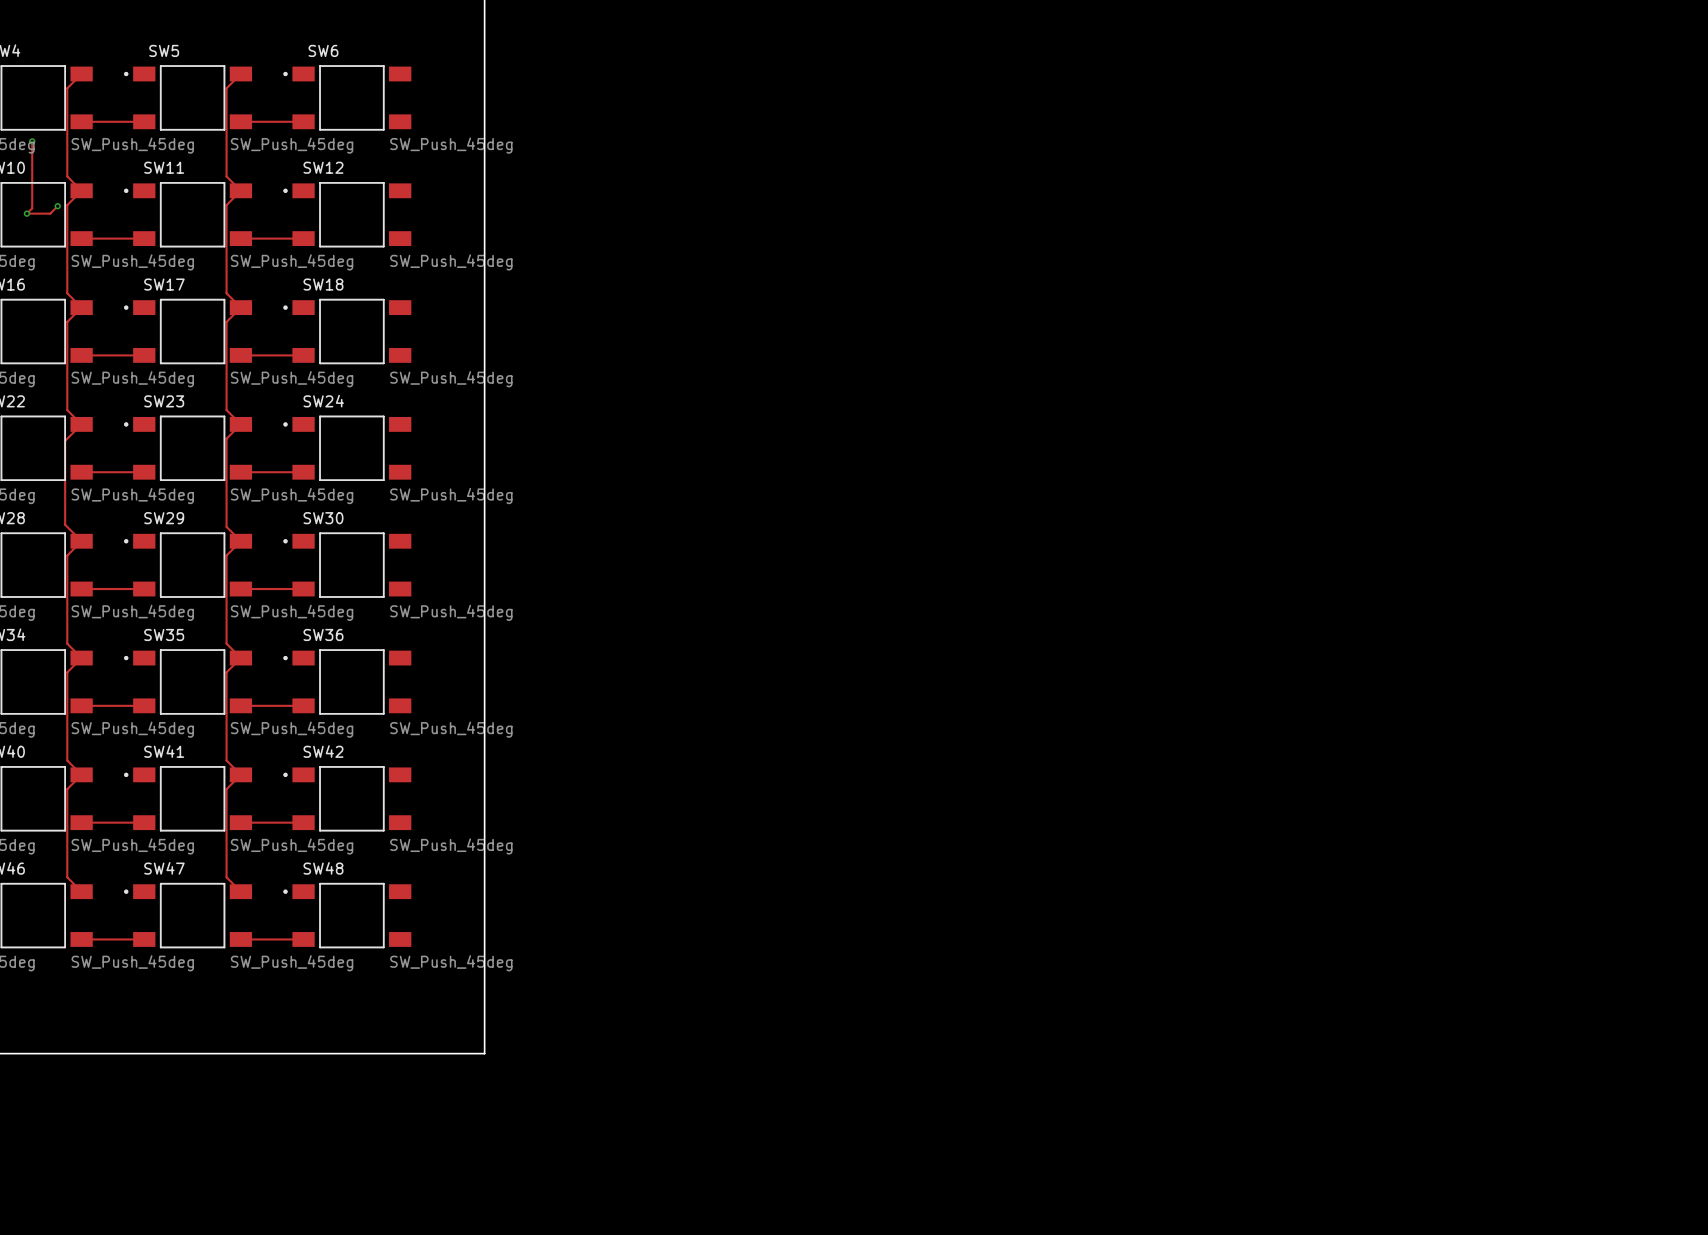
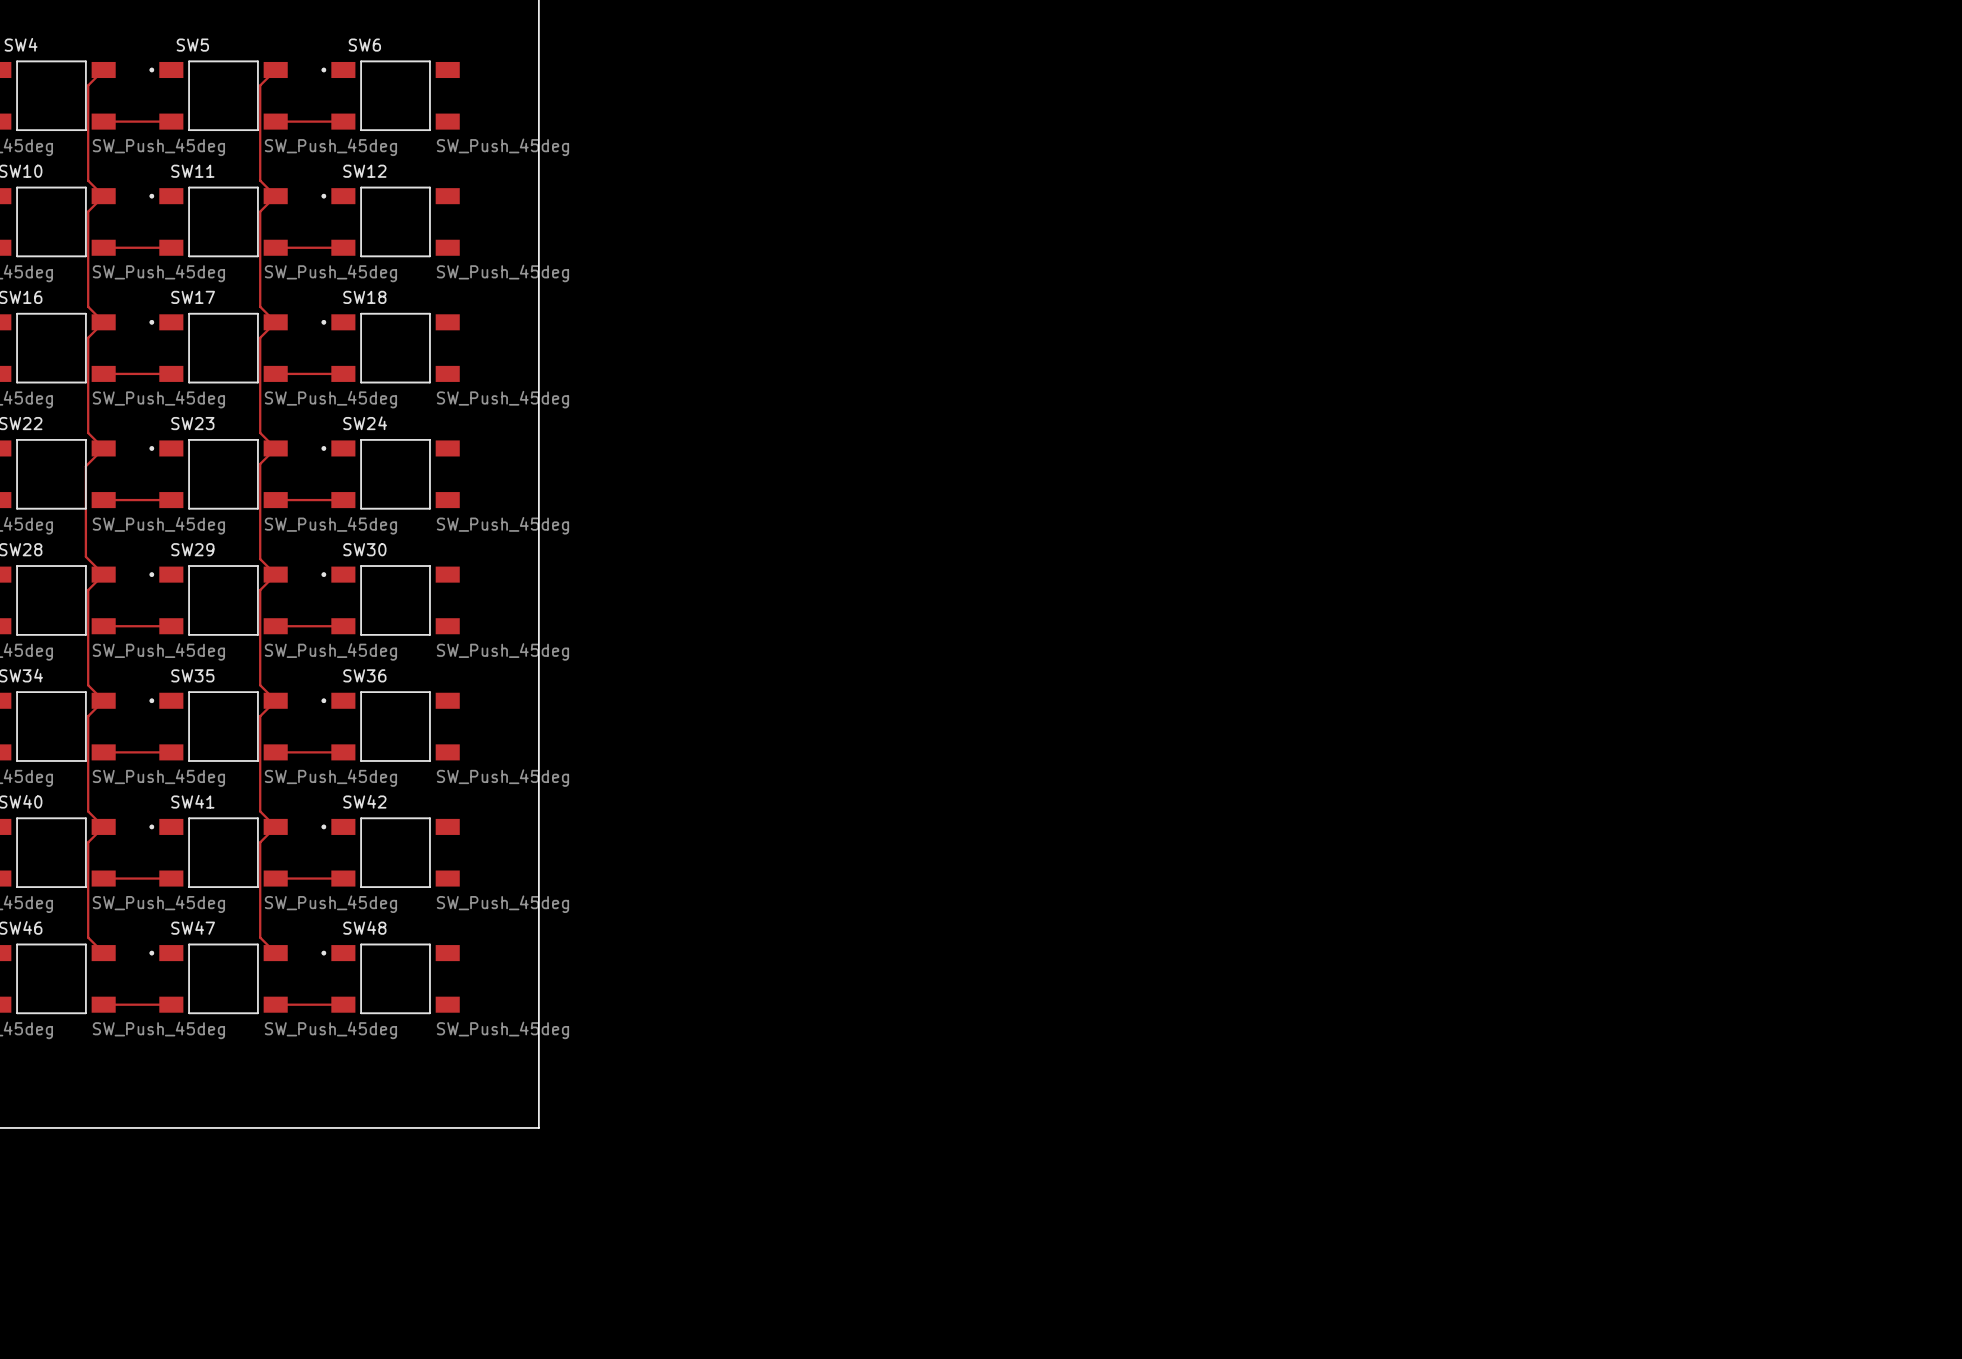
track: (32, 141) (32, 208) (26, 213) (50, 213) (57, 206) -> none
via: (32, 141) -> none
via: (57, 206) -> none
via: (26, 213) -> none

